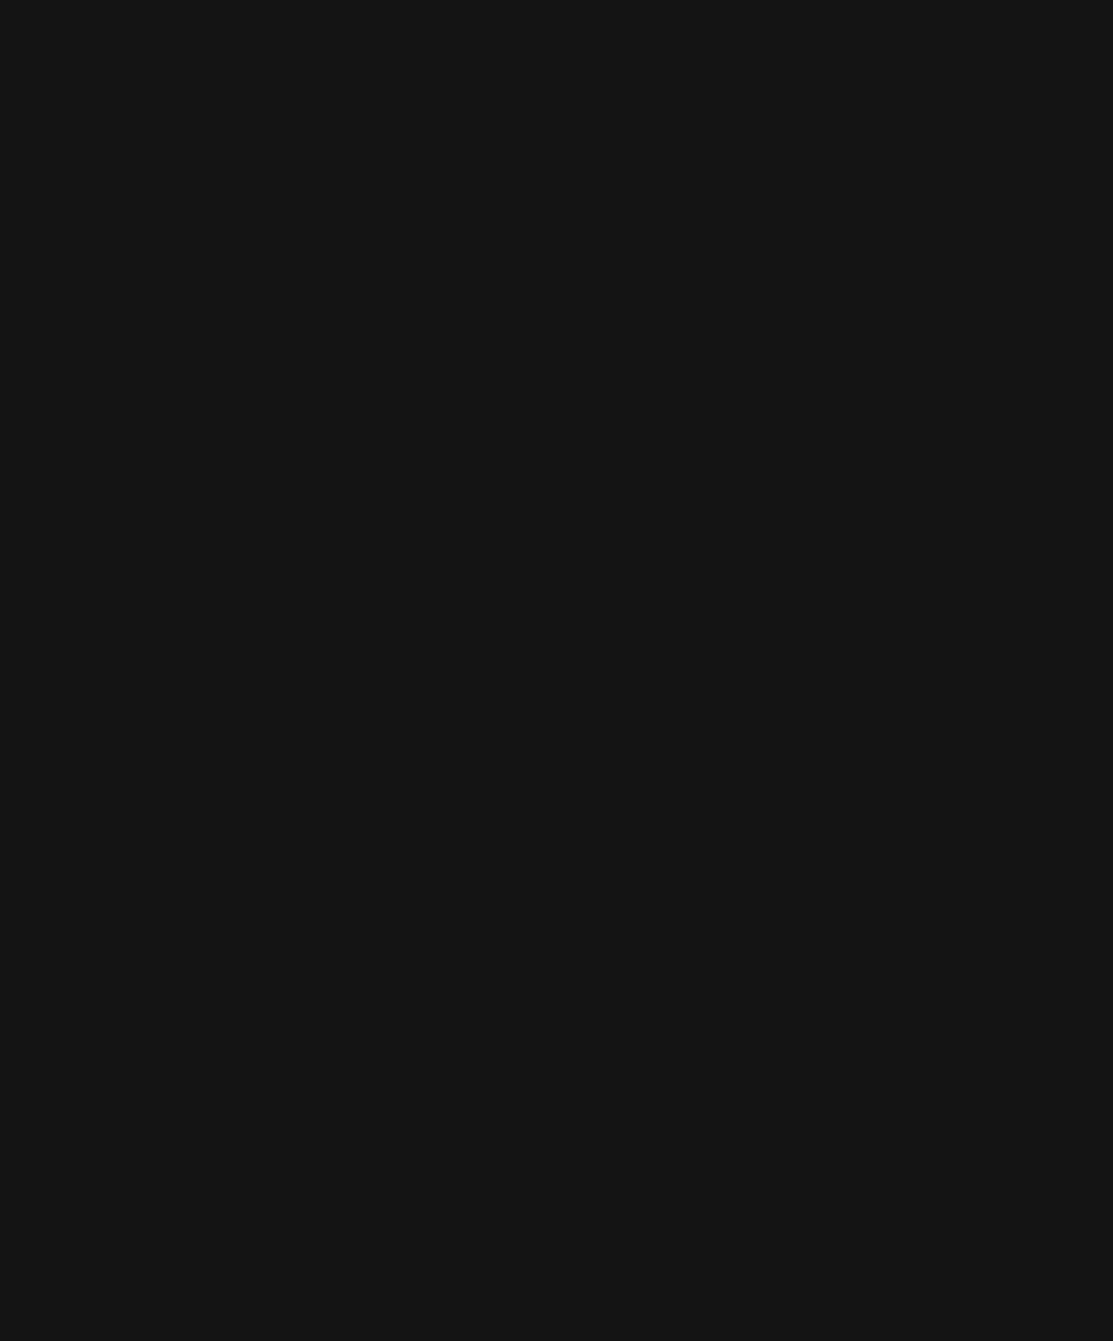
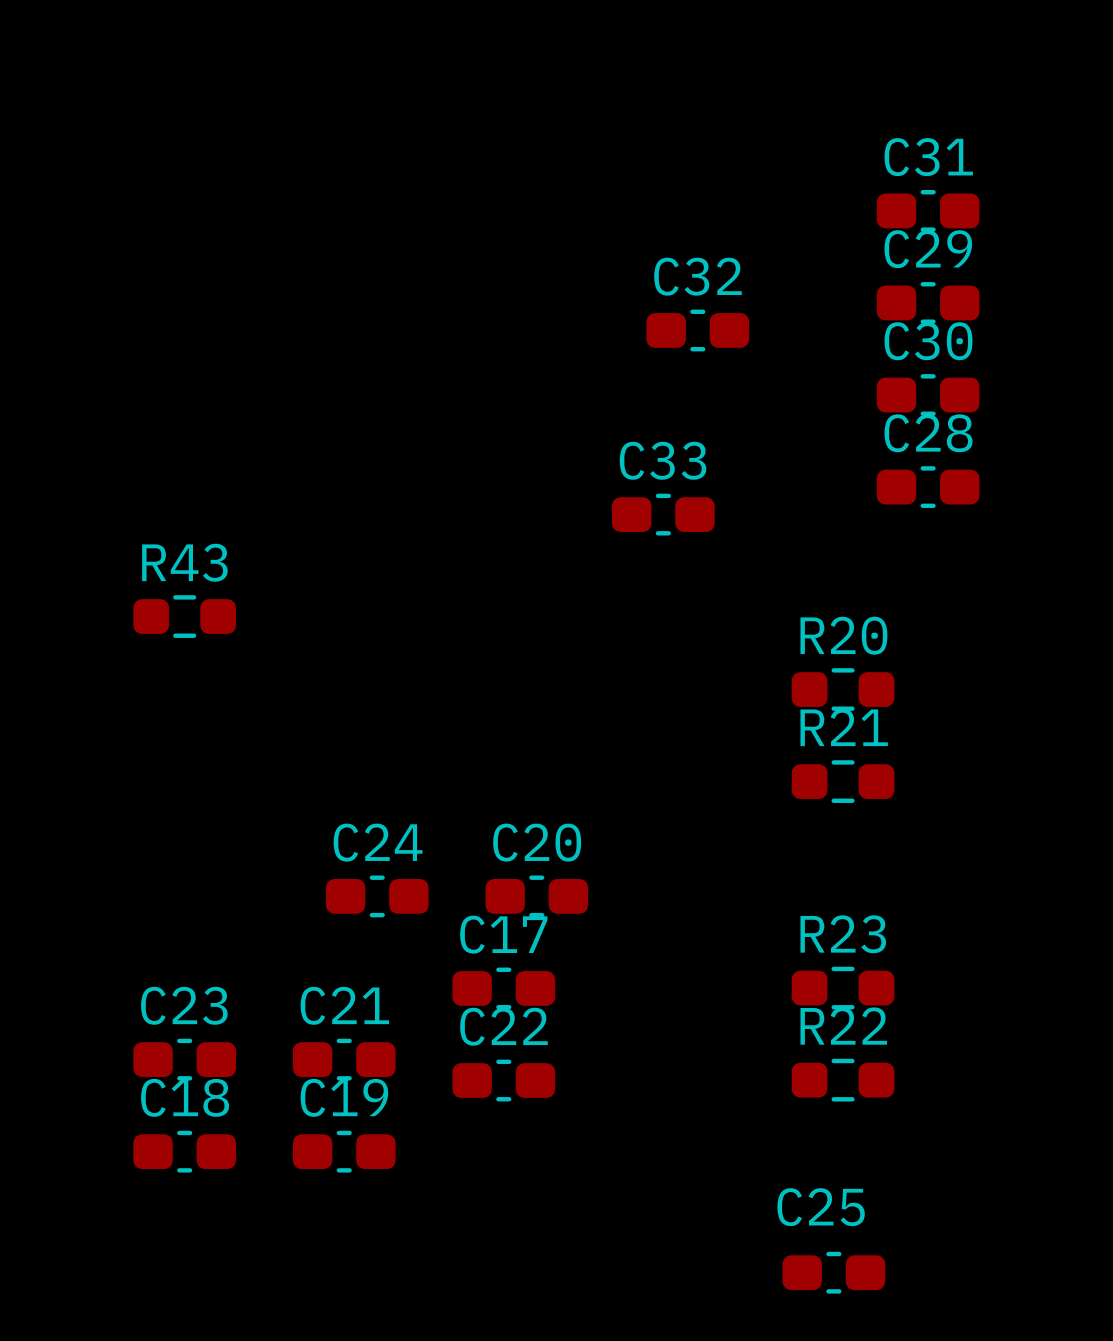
C31: none -> (928, 210)
C29: none -> (928, 302)
C32: none -> (697, 330)
C30: none -> (928, 395)
C28: none -> (928, 487)
C33: none -> (663, 514)
R43: none -> (184, 616)
R20: none -> (843, 689)
R21: none -> (843, 781)
C24: none -> (377, 896)
C20: none -> (536, 896)
C17: none -> (503, 988)
R23: none -> (843, 988)
C23: none -> (184, 1059)
C21: none -> (344, 1059)
C22: none -> (503, 1080)
R22: none -> (843, 1080)
C18: none -> (184, 1151)
C19: none -> (344, 1151)
C25: none -> (833, 1272)

